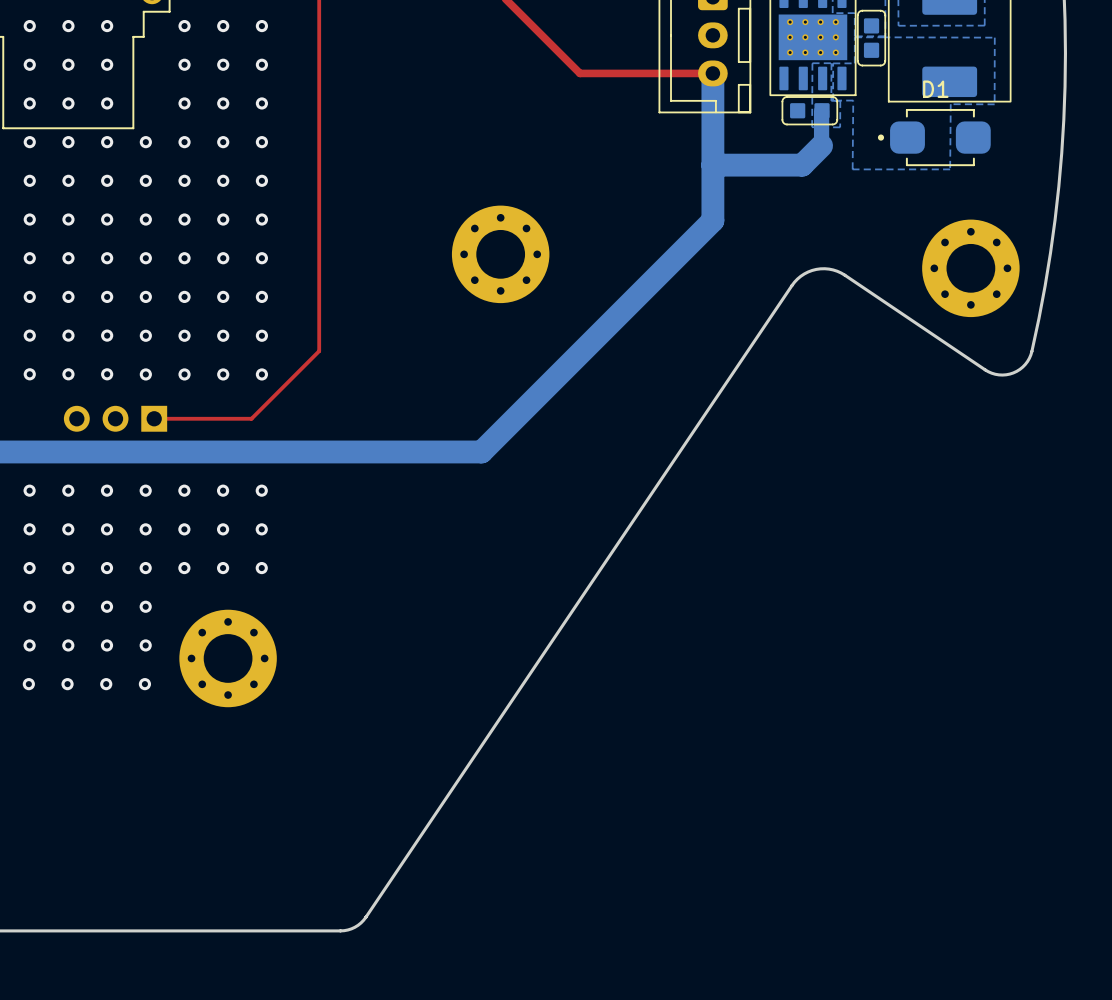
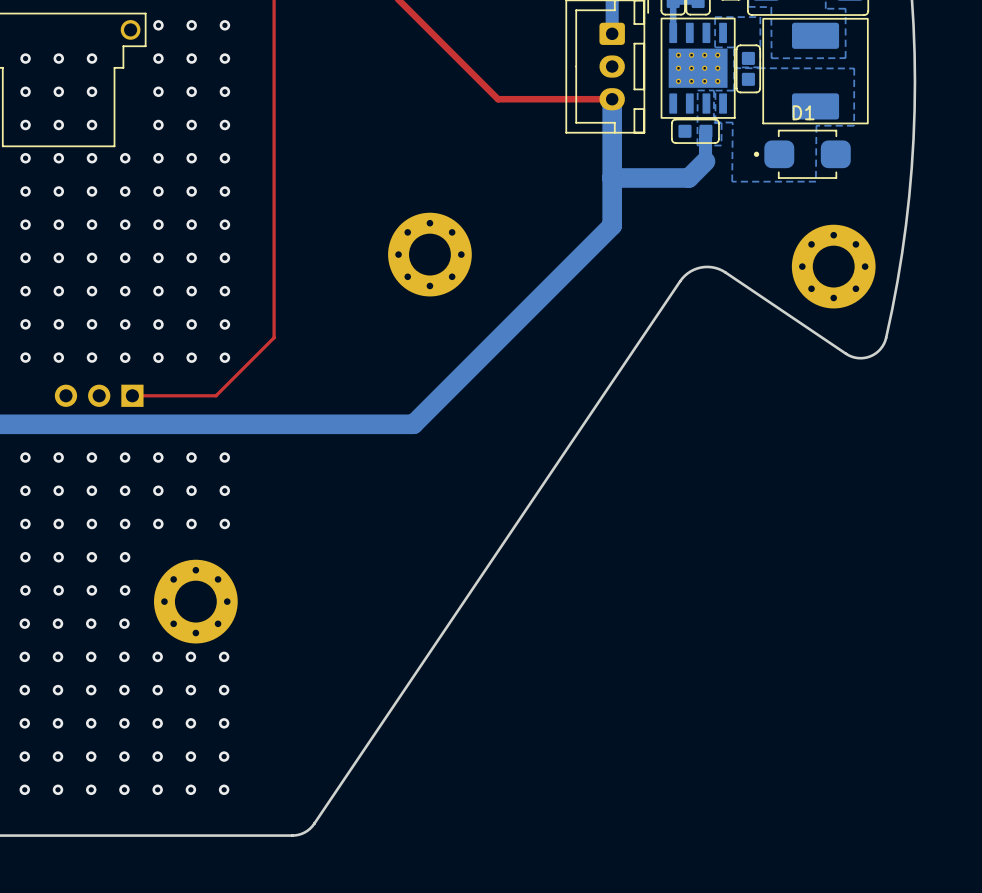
via: none -> (24, 656)
via: none -> (58, 656)
via: none -> (91, 656)
via: none -> (124, 656)
via: none -> (157, 656)
via: none -> (190, 656)
via: none -> (224, 656)
via: none -> (24, 690)
via: none -> (58, 690)
via: none -> (91, 690)
via: none -> (124, 690)
via: none -> (157, 690)
via: none -> (190, 690)
via: none -> (224, 690)
via: none -> (24, 723)
via: none -> (58, 723)
via: none -> (91, 723)
via: none -> (124, 723)
via: none -> (157, 723)
via: none -> (190, 723)
via: none -> (224, 723)
via: none -> (24, 756)
via: none -> (58, 756)
via: none -> (91, 756)
via: none -> (124, 756)
via: none -> (157, 756)
via: none -> (190, 756)
via: none -> (224, 756)
via: none -> (24, 789)
via: none -> (58, 789)
via: none -> (91, 789)
via: none -> (124, 789)
via: none -> (157, 789)
via: none -> (190, 789)
via: none -> (224, 789)

